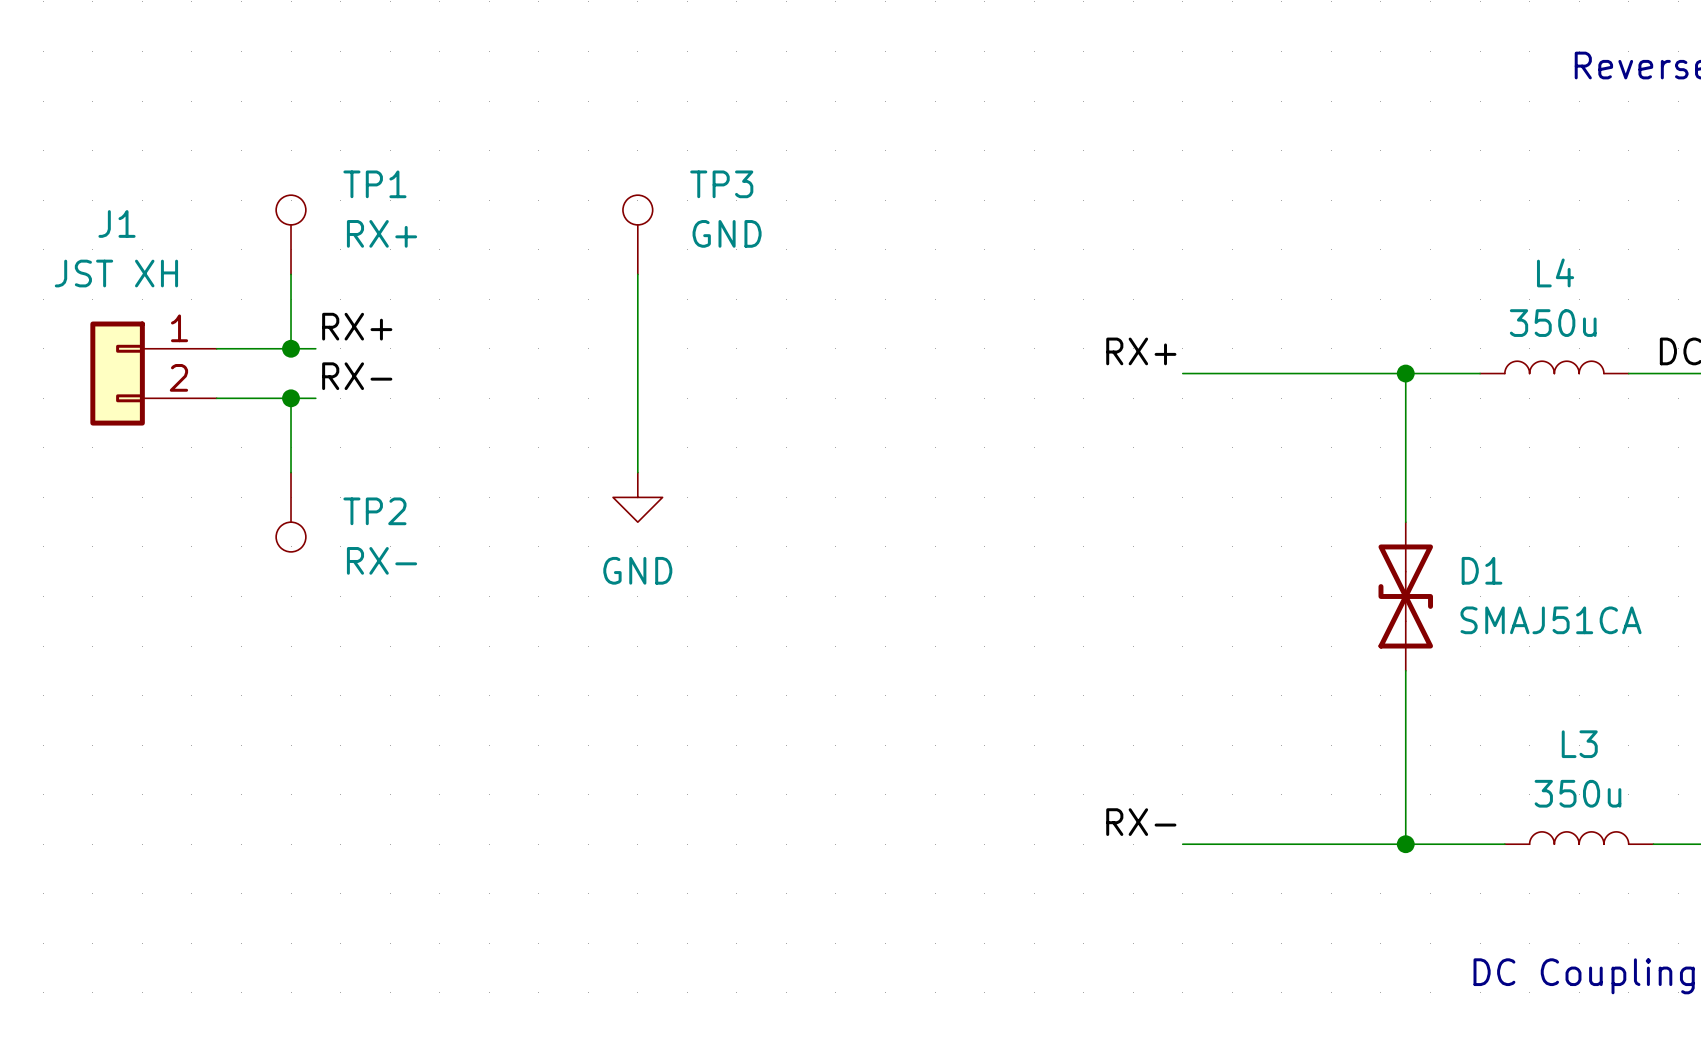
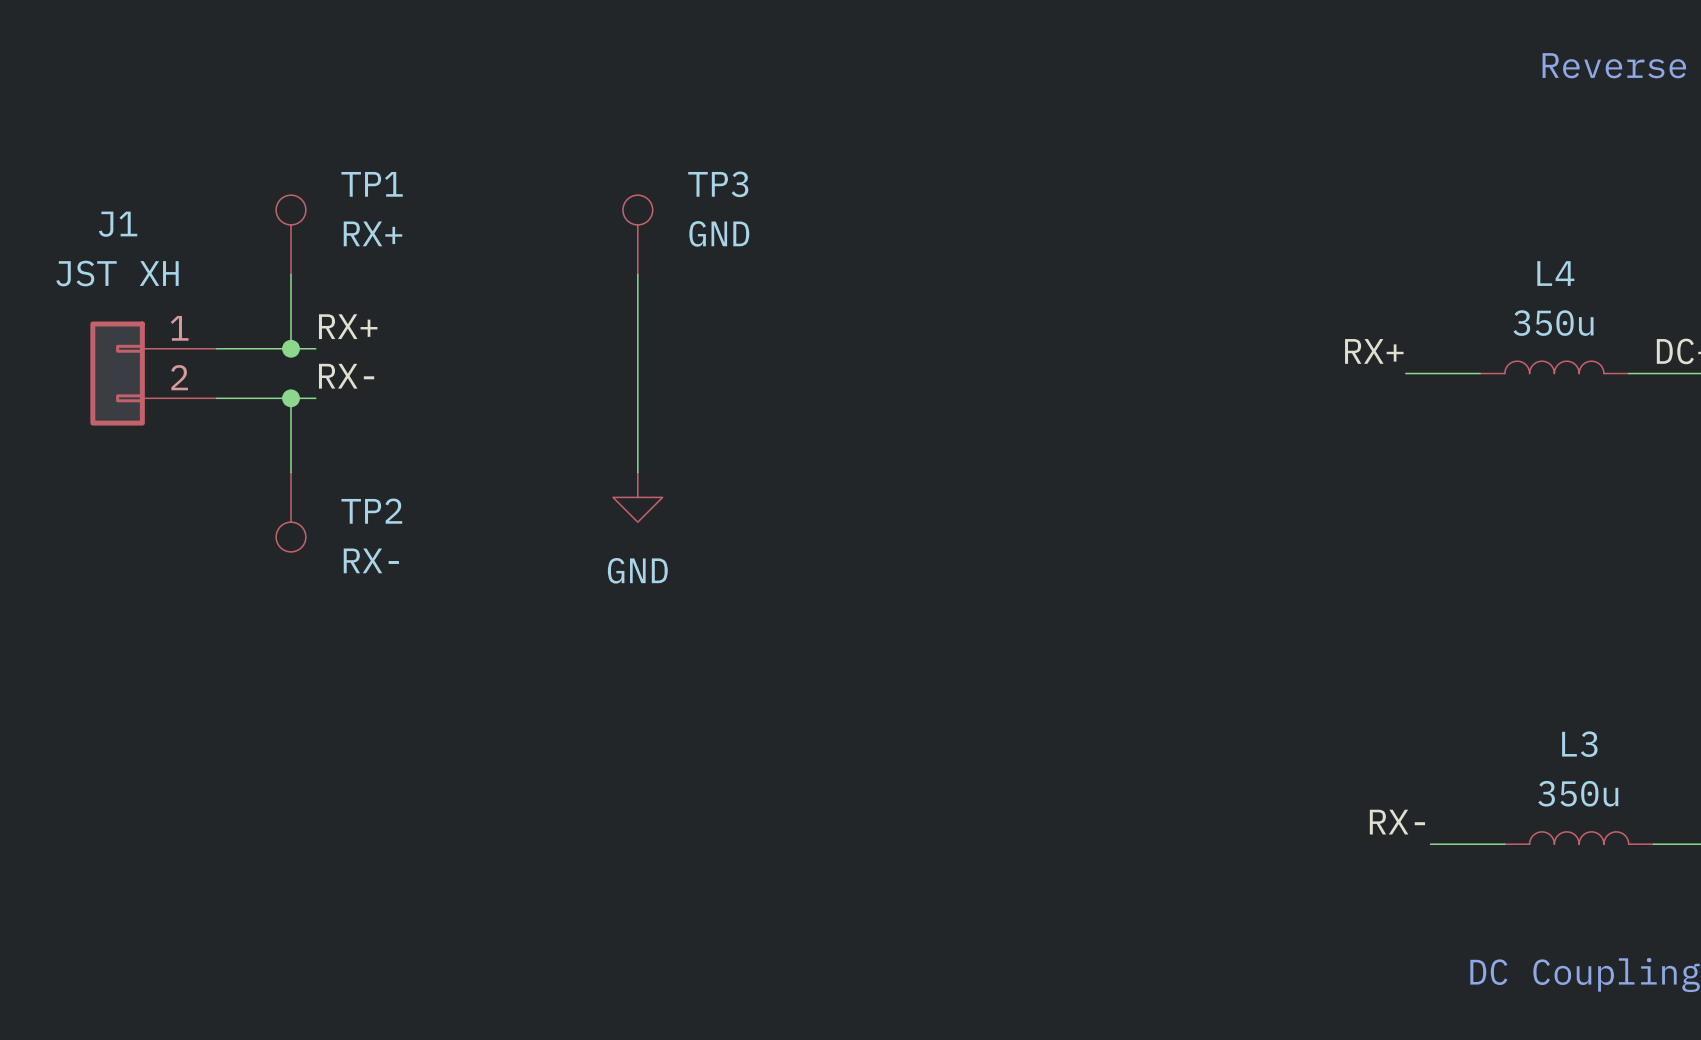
label position: RX+ (1141, 351) -> RX+ (1374, 351)
wire: (1182, 373) (1405, 373) (1405, 522) -> none
junction: (1405, 373) -> none
D1: SMAJ51CA (1405, 596) -> none
wire: (1405, 670) (1405, 844) -> none
label position: RX- (1141, 822) -> RX- (1397, 822)
wire: (1182, 844) (1430, 844) -> none
junction: (1405, 844) -> none

